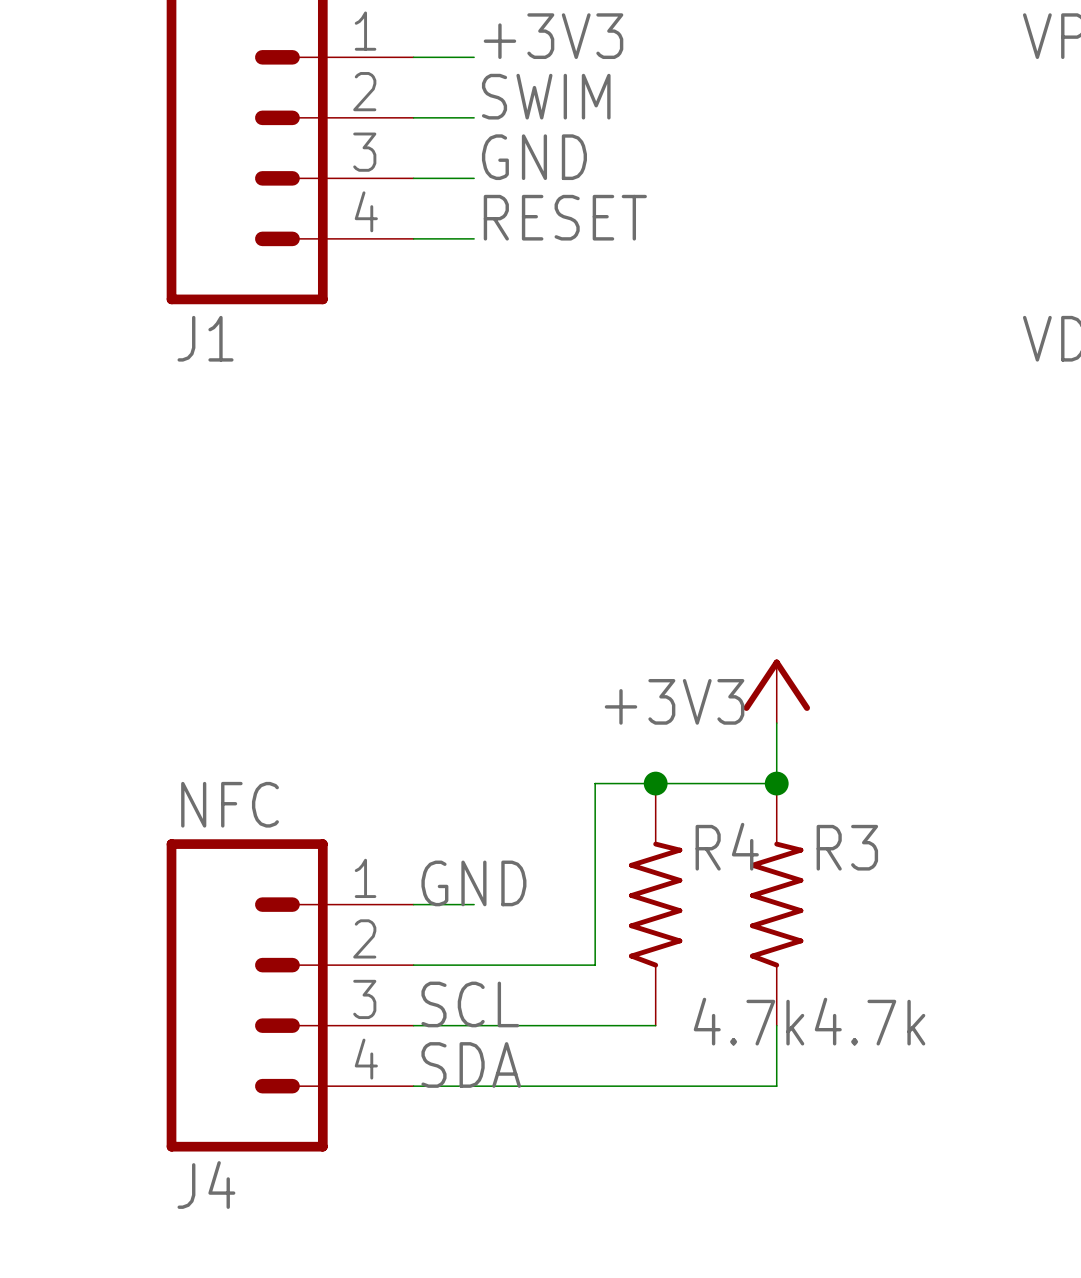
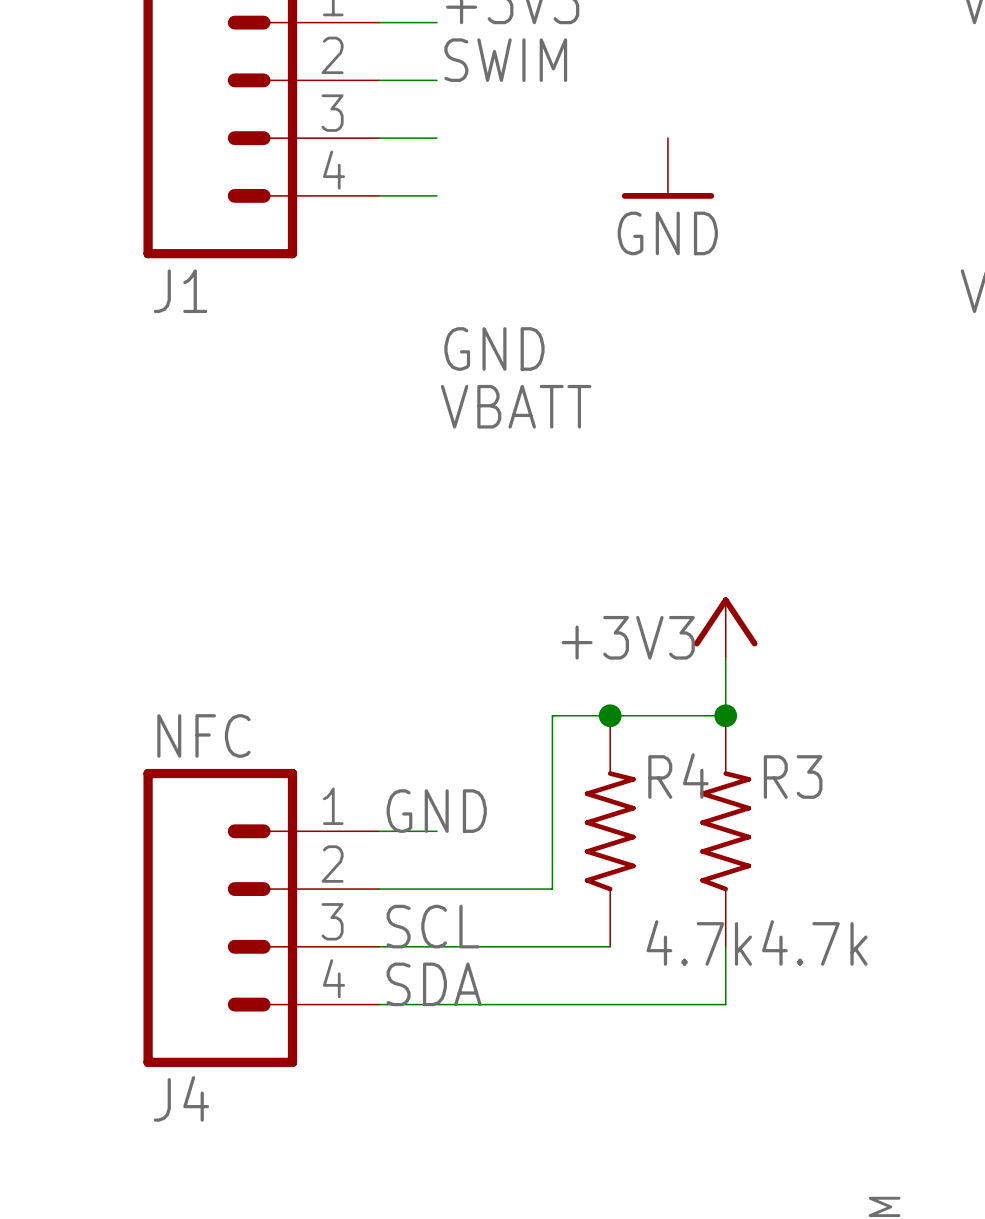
label: GND (534, 157) -> none
power symbol: none -> GND (667, 168)
label: RESET (565, 217) -> none
label: none -> GND (494, 348)
label: none -> VBATT (516, 406)

